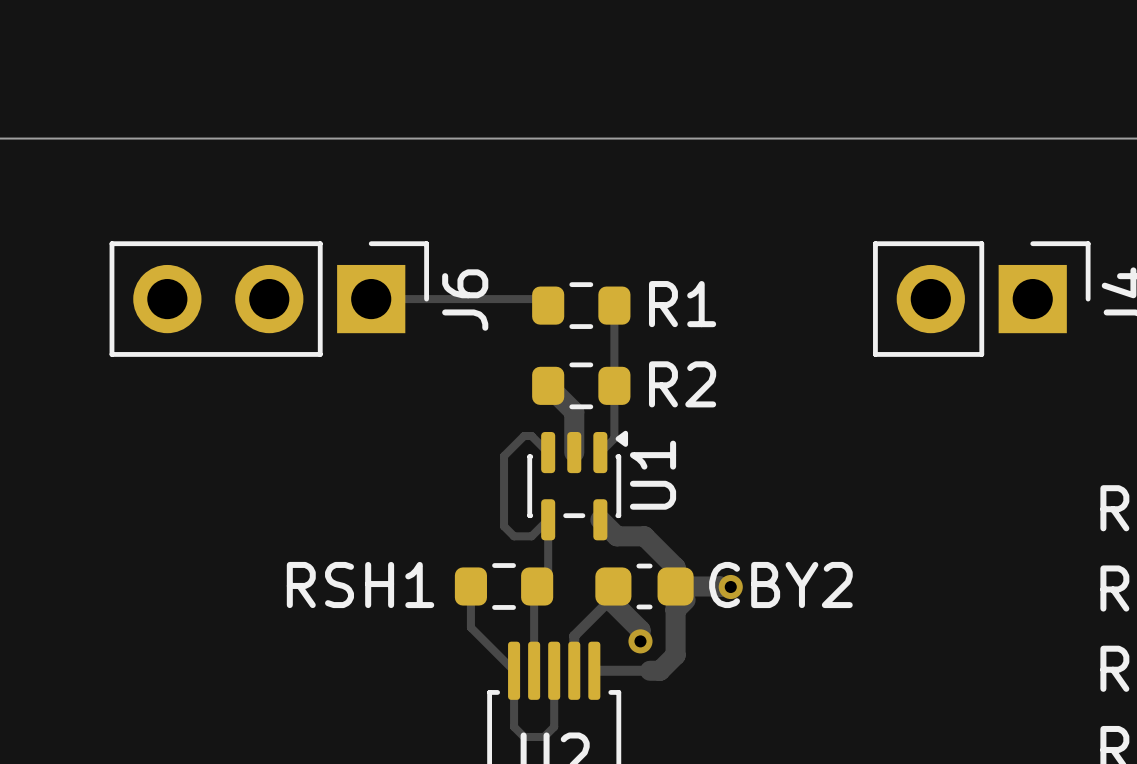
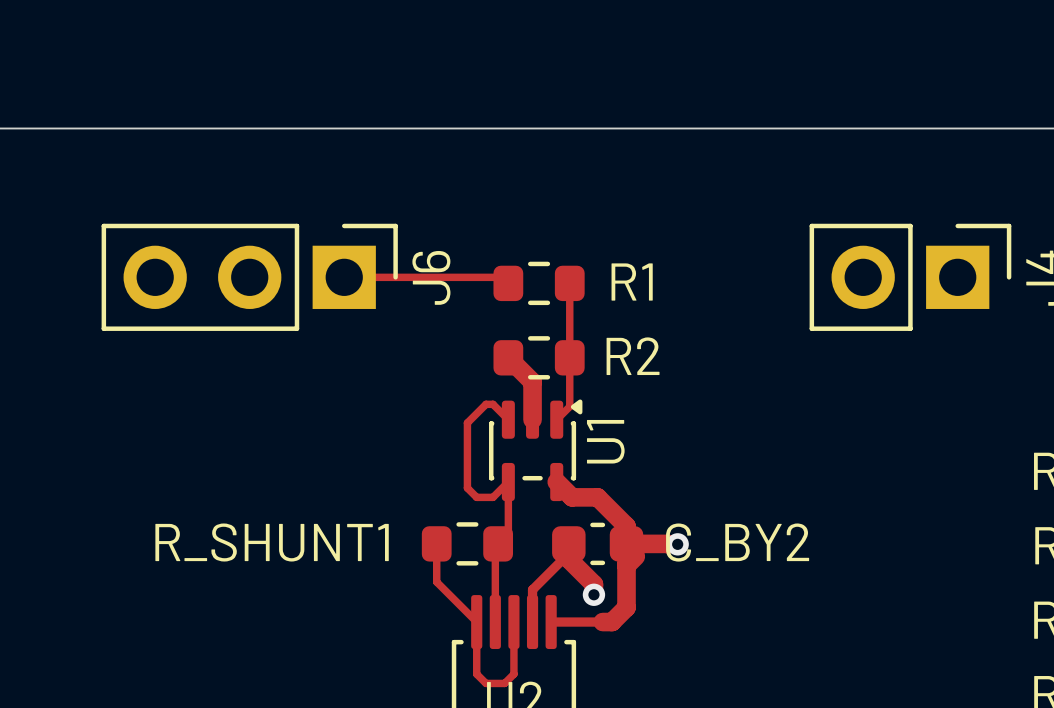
RSH1 name: RSH1 (360, 584) -> R_SHUNT1 (272, 542)
CBY2 name: CBY2 (780, 584) -> C_BY2 (737, 542)

